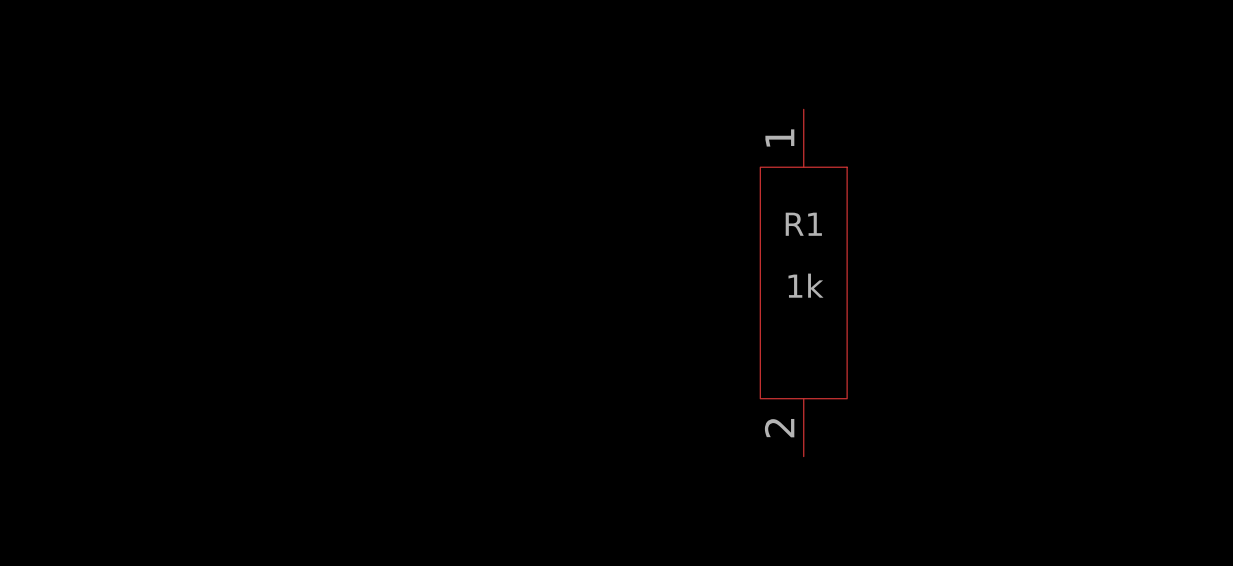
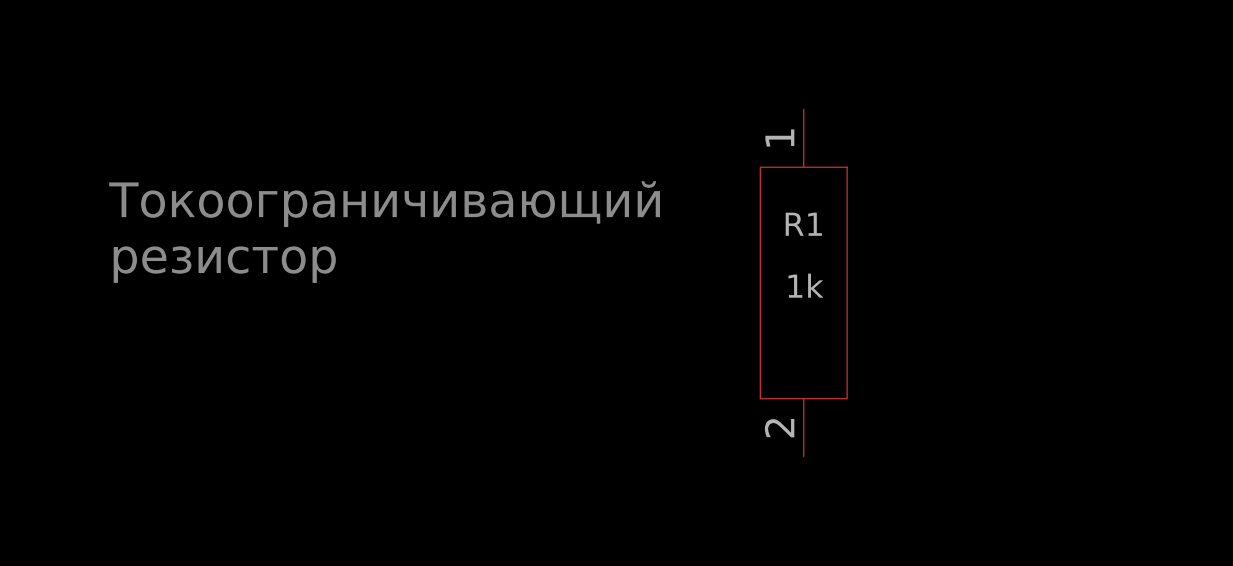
text: none -> Токоограничивающий (384, 204)
text: none -> резистор (224, 264)

